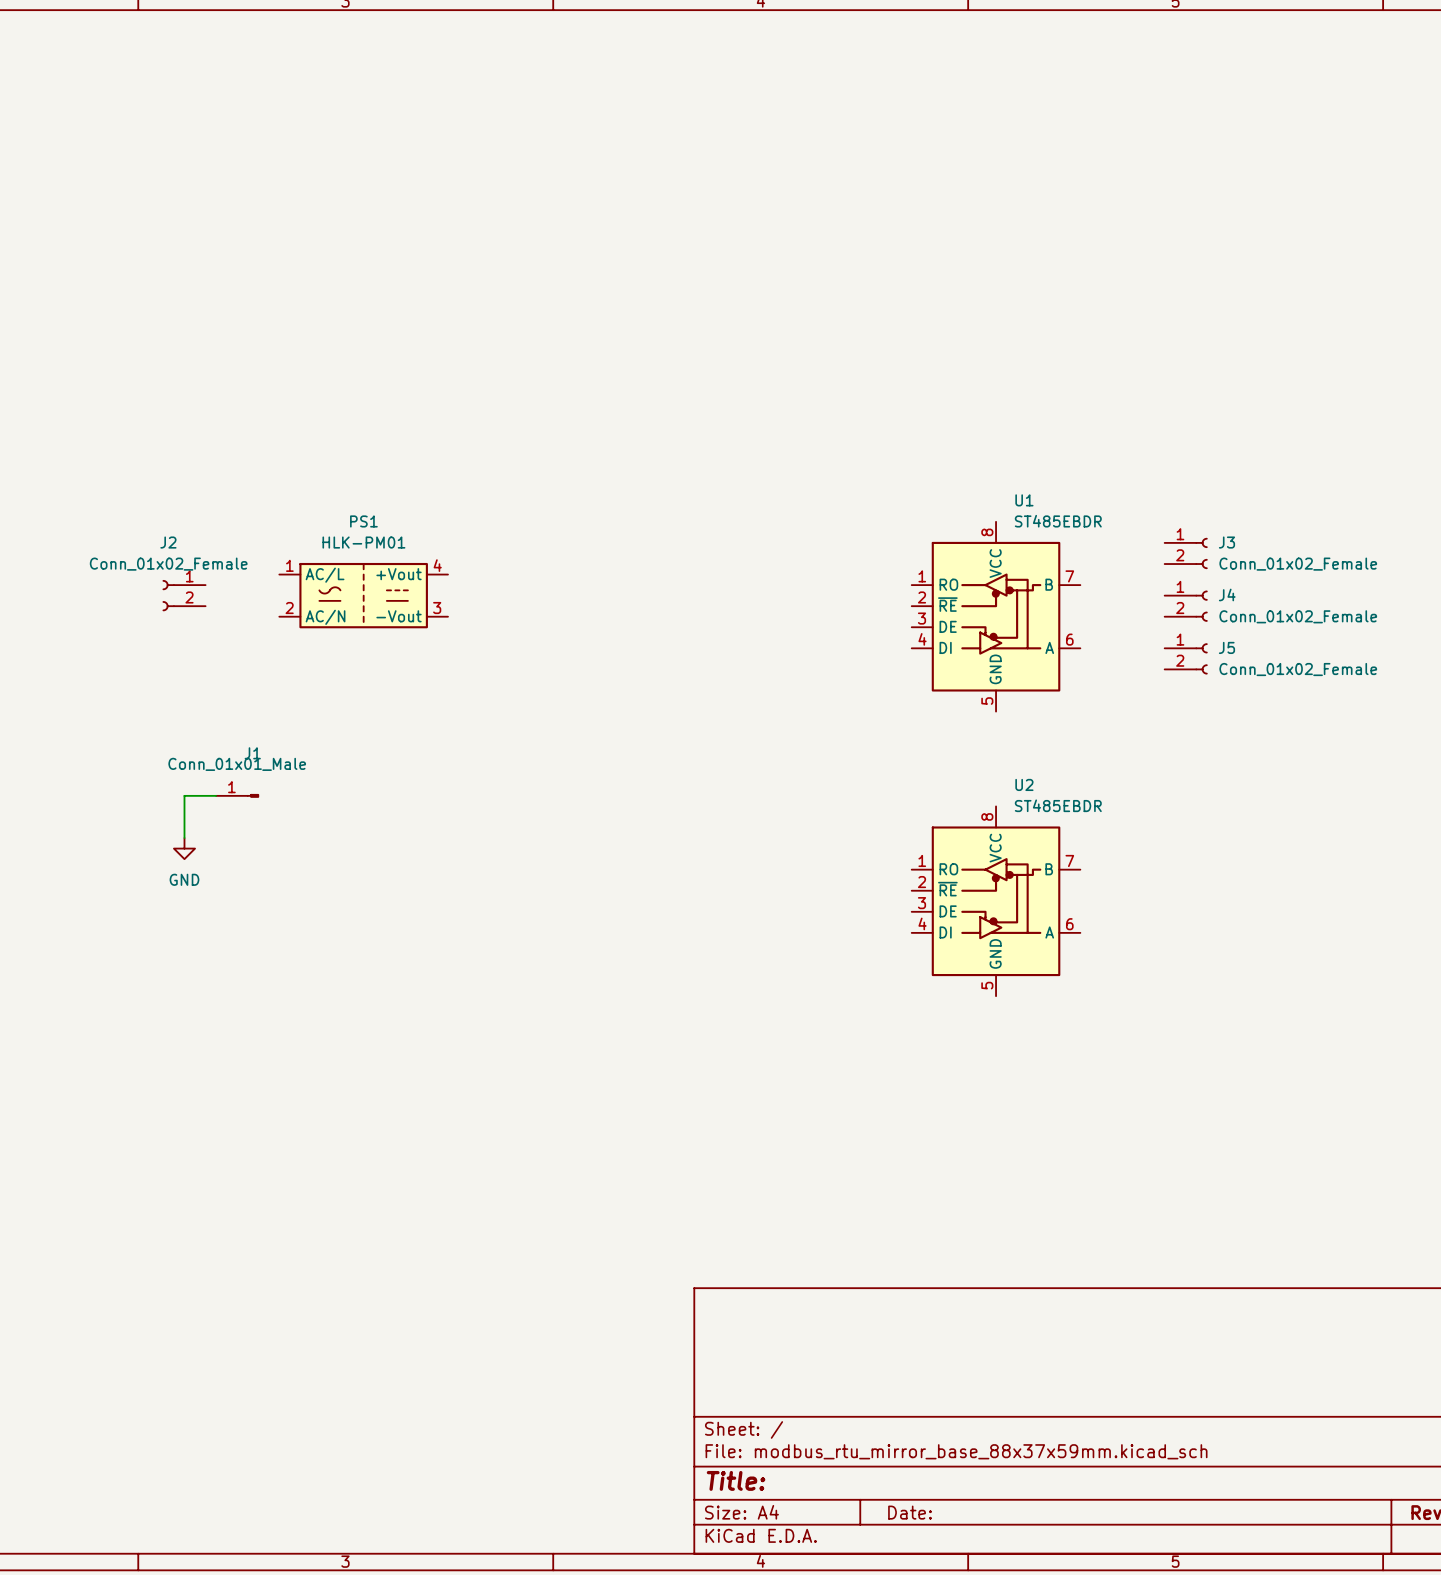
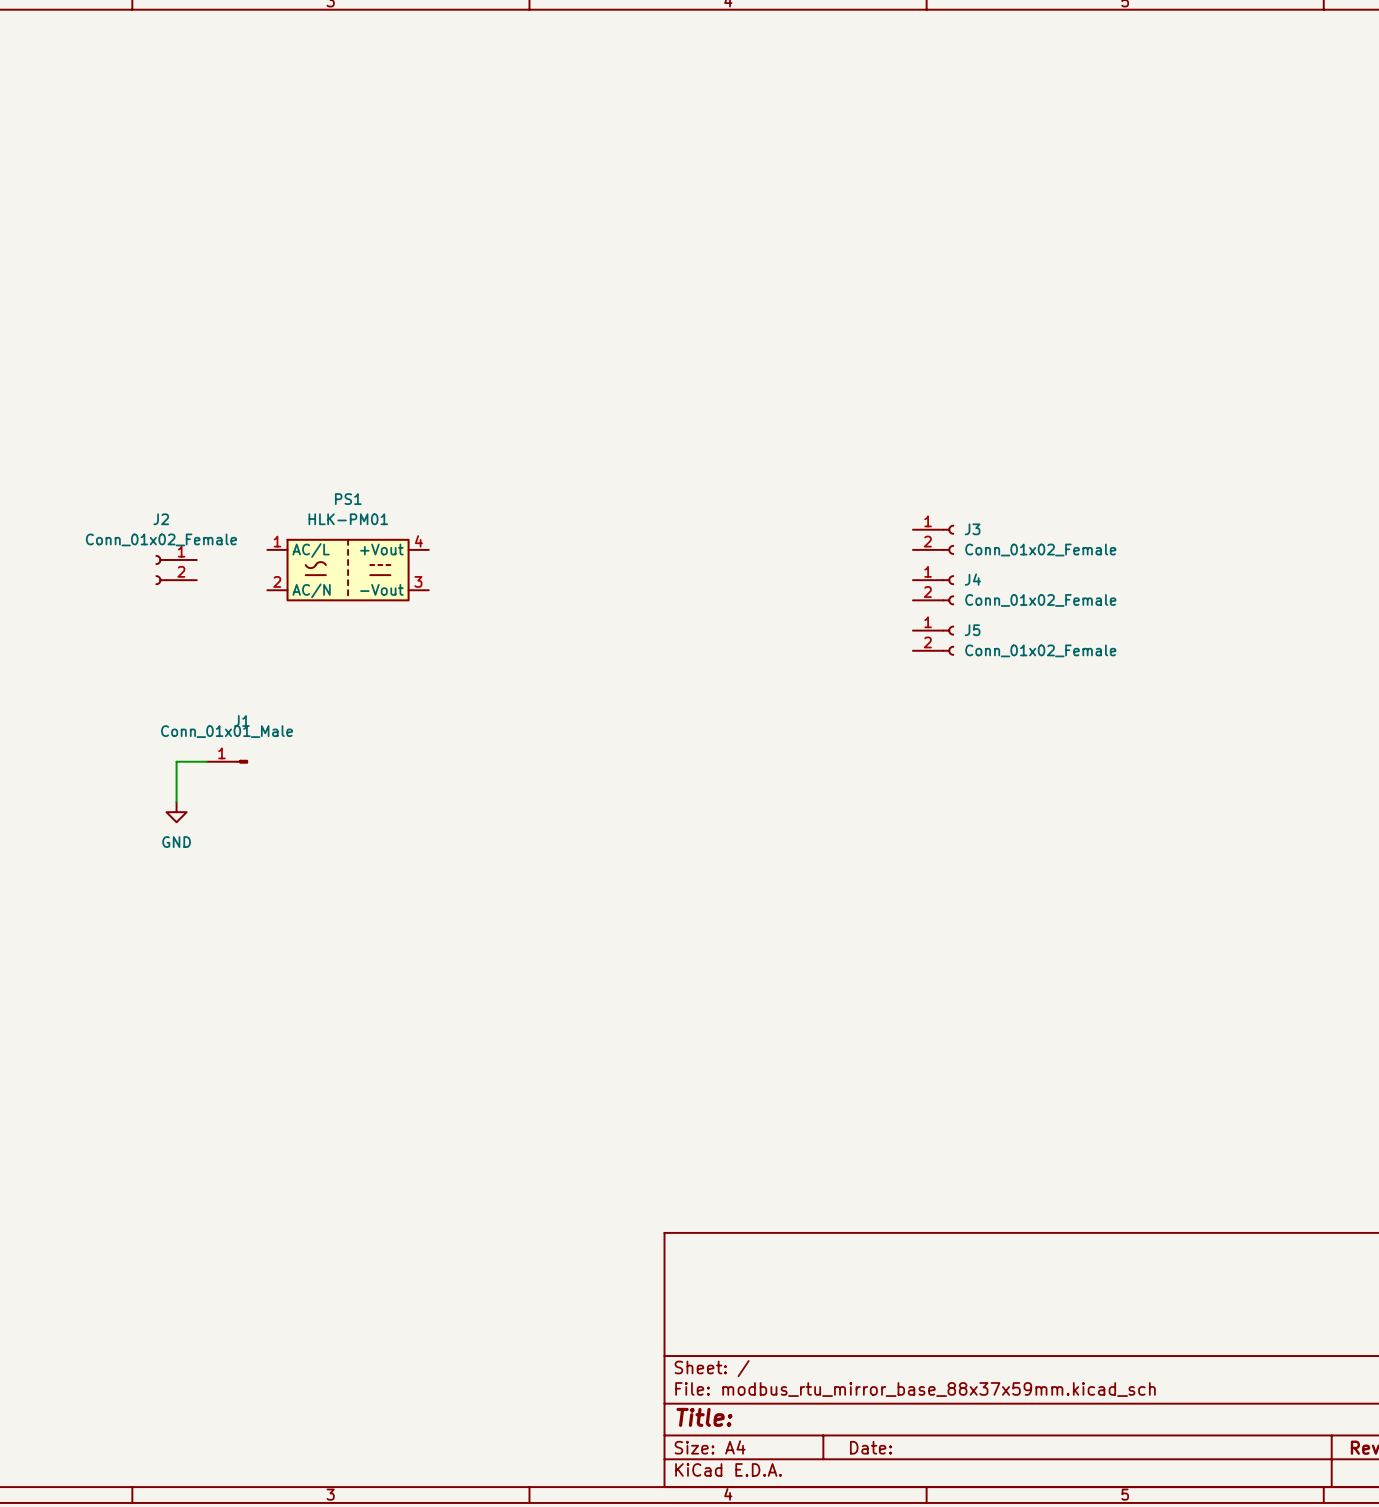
J3 position: (1186, 553) -> (933, 539)
J4 position: (1186, 606) -> (933, 590)
U1: ST485EBDR (996, 616) -> none
J5 position: (1186, 658) -> (933, 640)
U2: ST485EBDR (996, 901) -> none

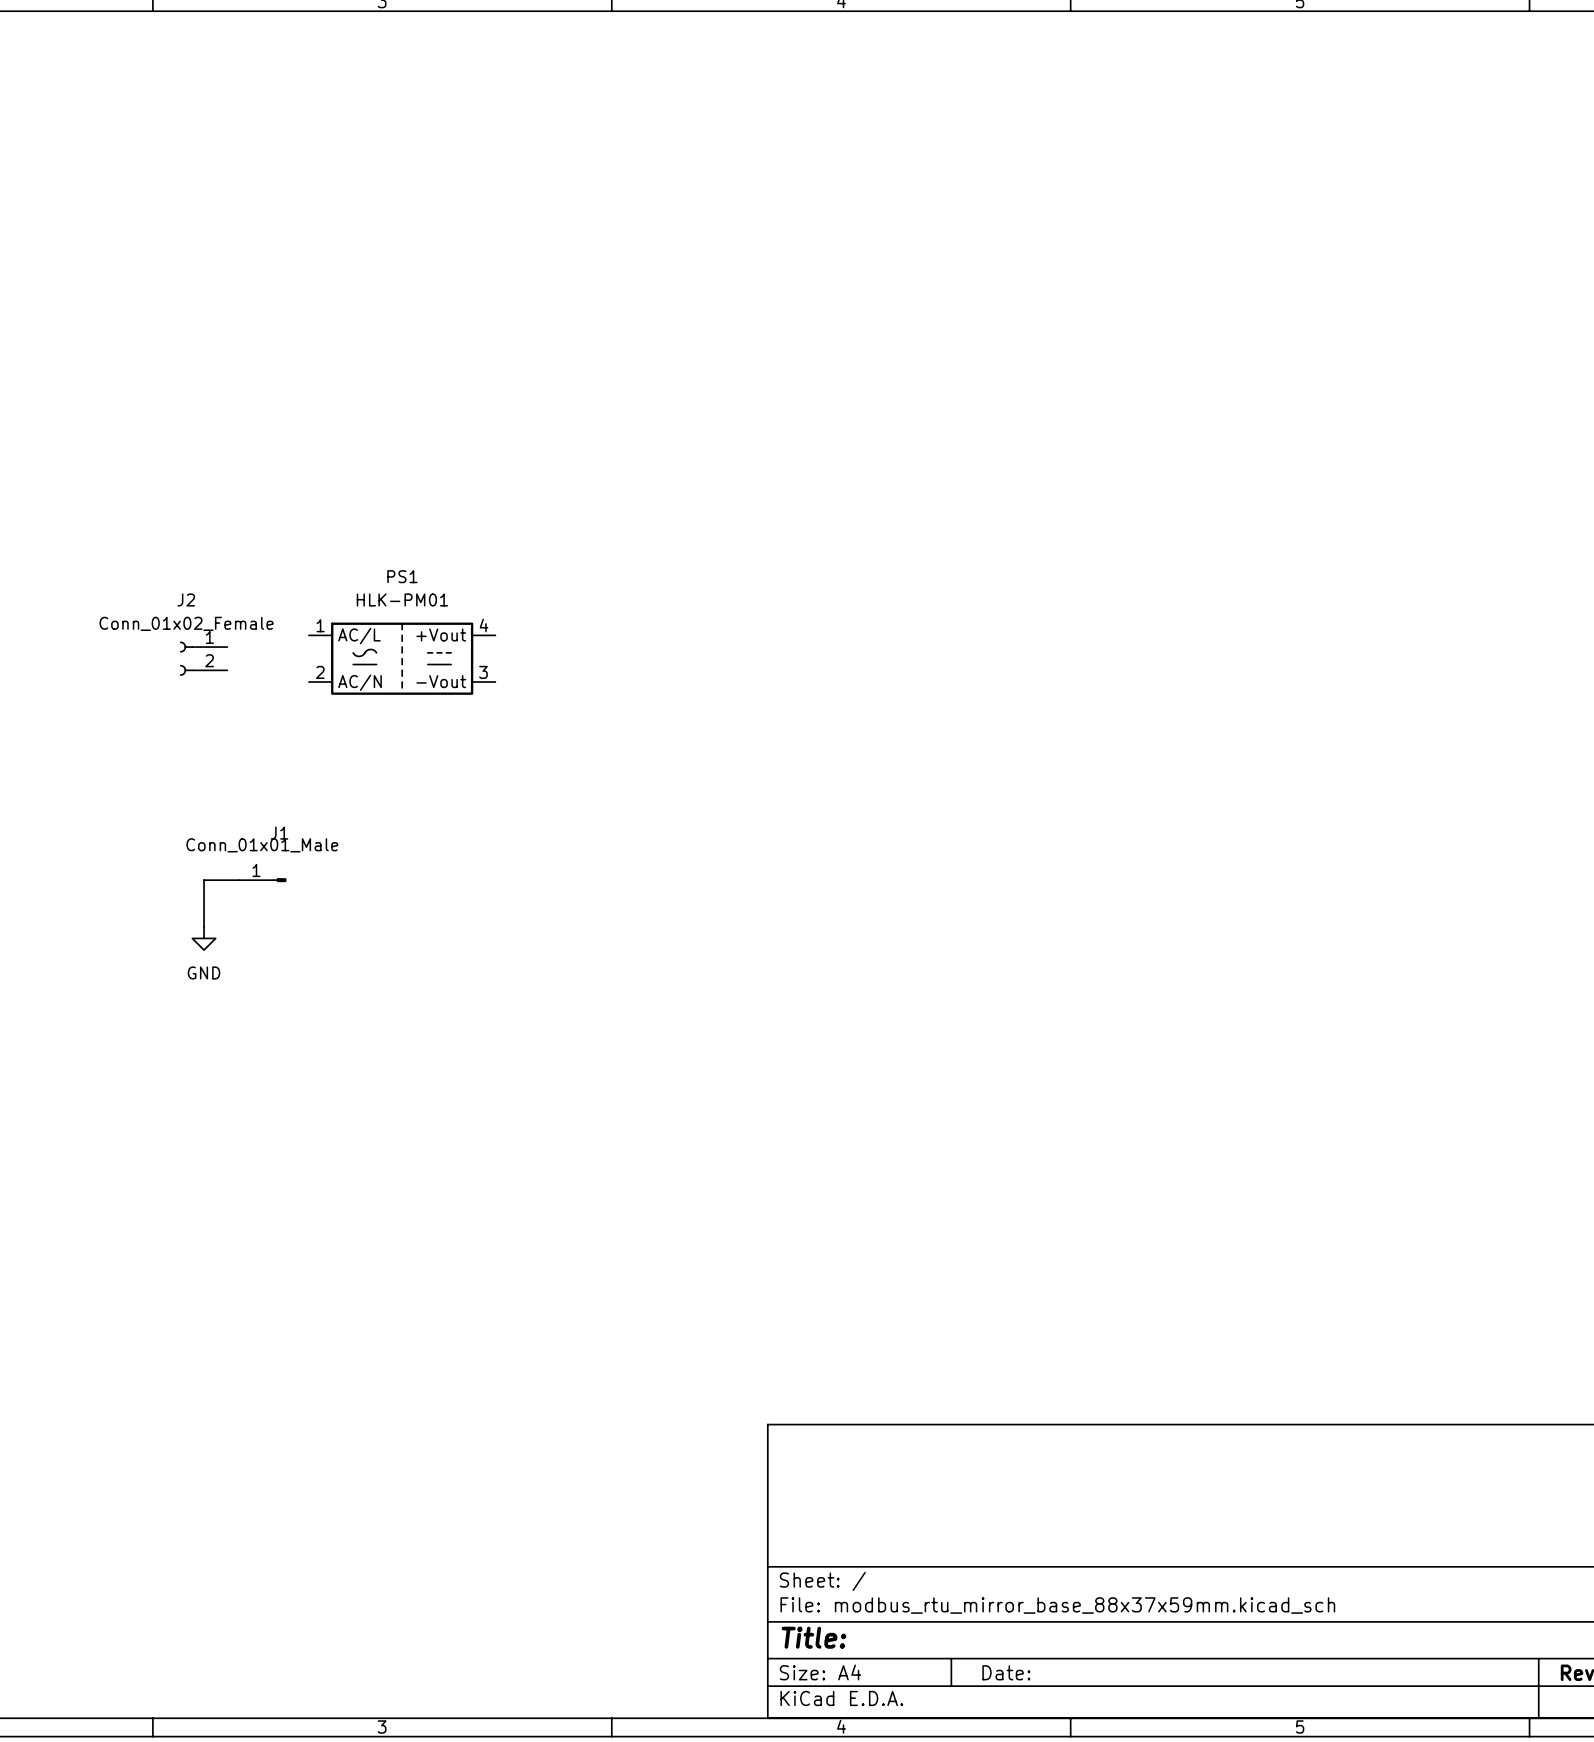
J3: Conn_01x02_Female (933, 539) -> none
J4: Conn_01x02_Female (933, 590) -> none
J5: Conn_01x02_Female (933, 640) -> none

